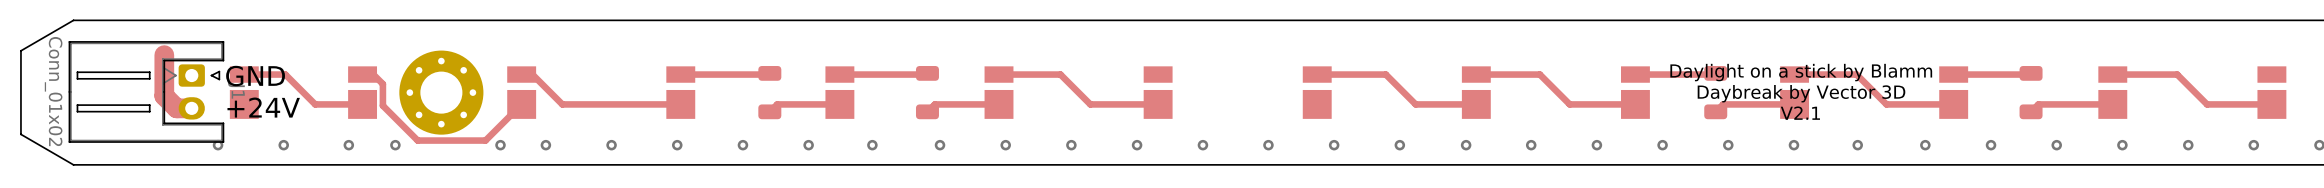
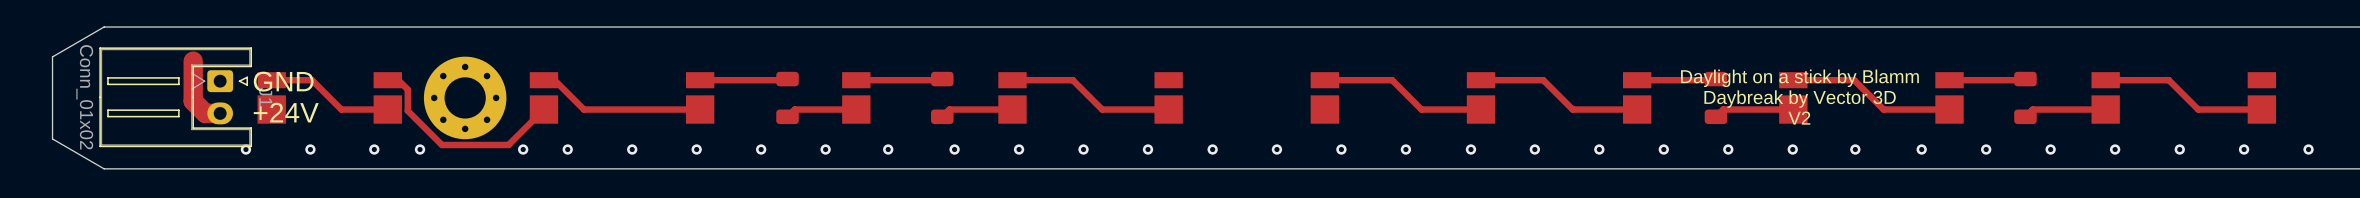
text: V2.1 (1800, 113) -> V2 (1799, 118)

